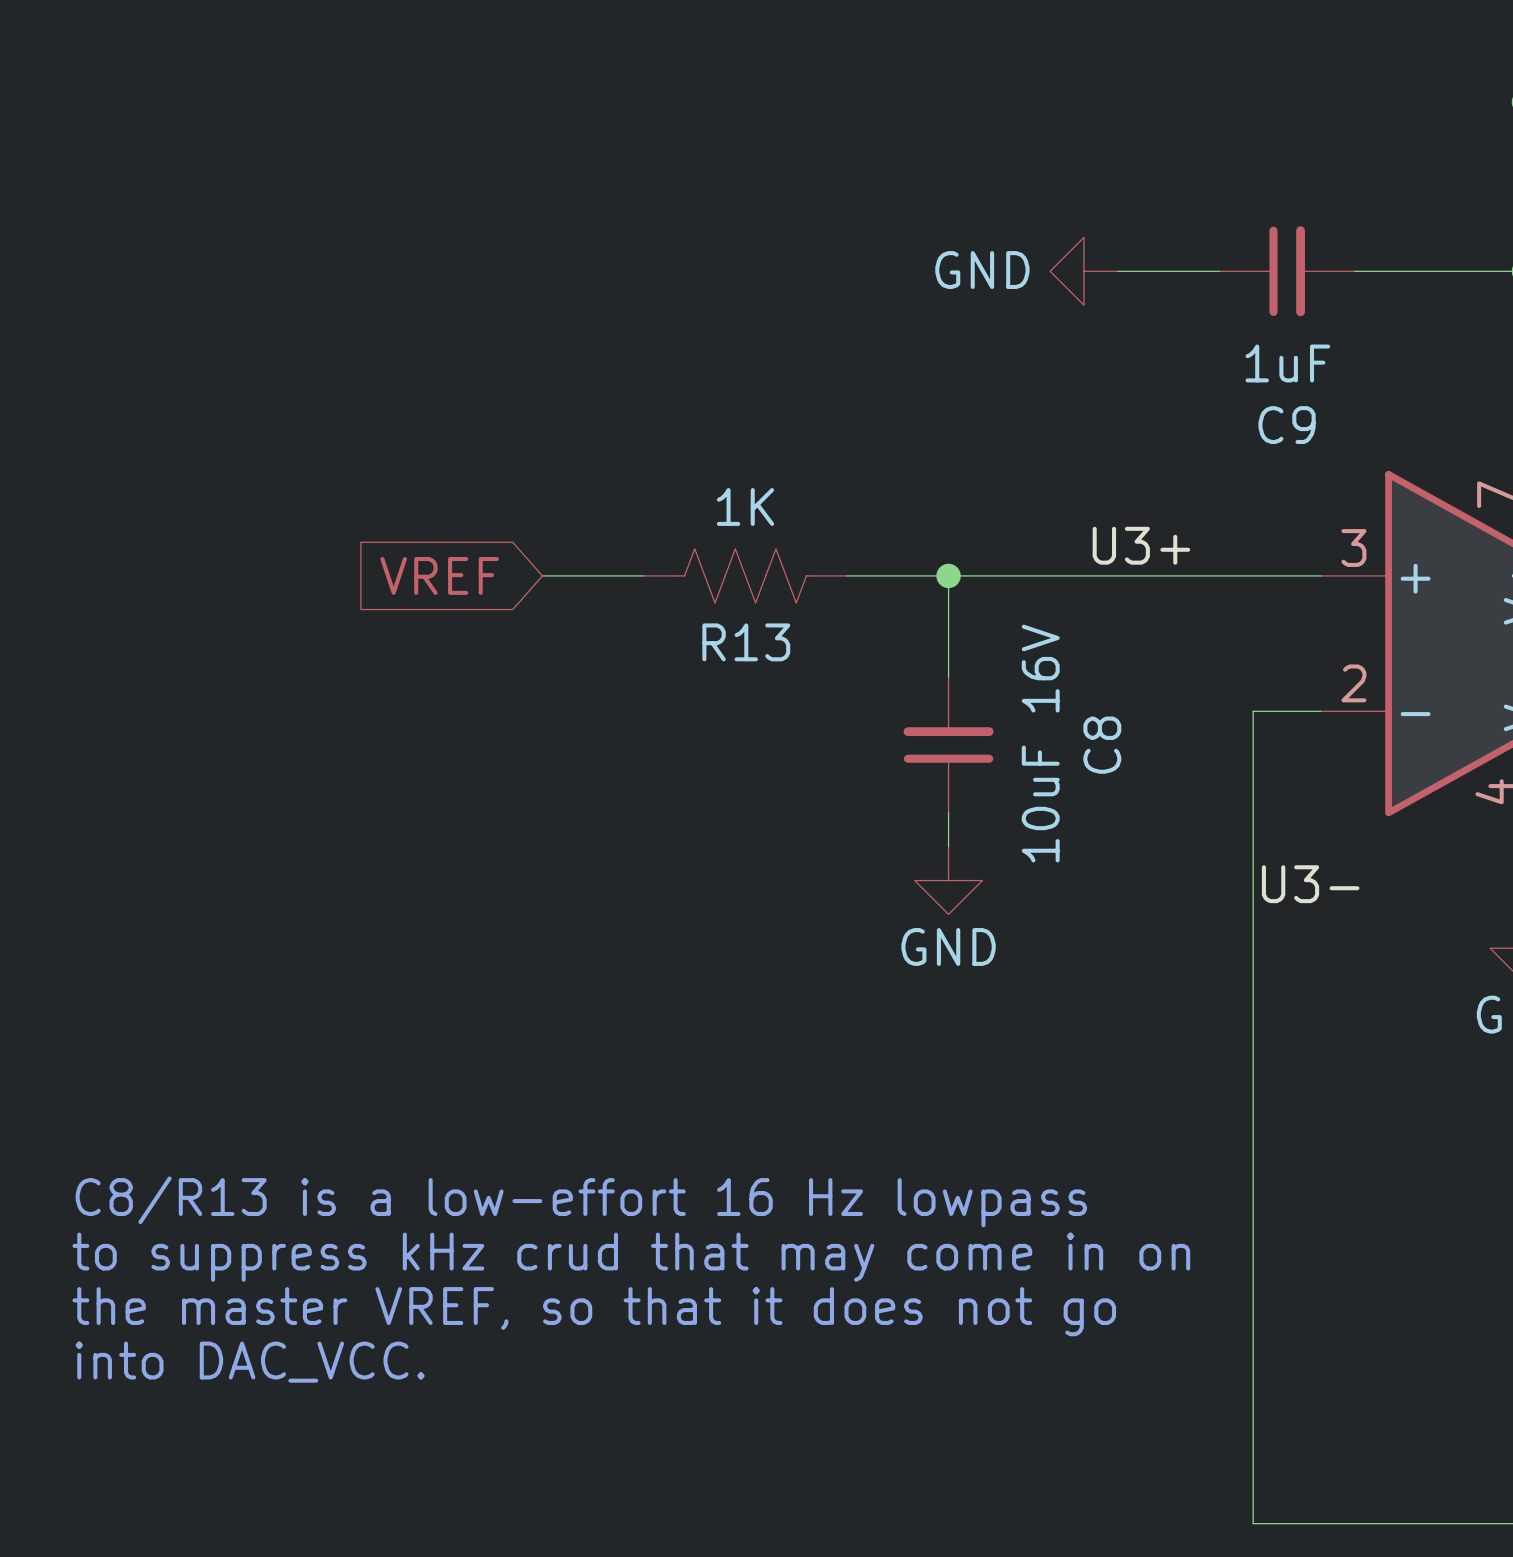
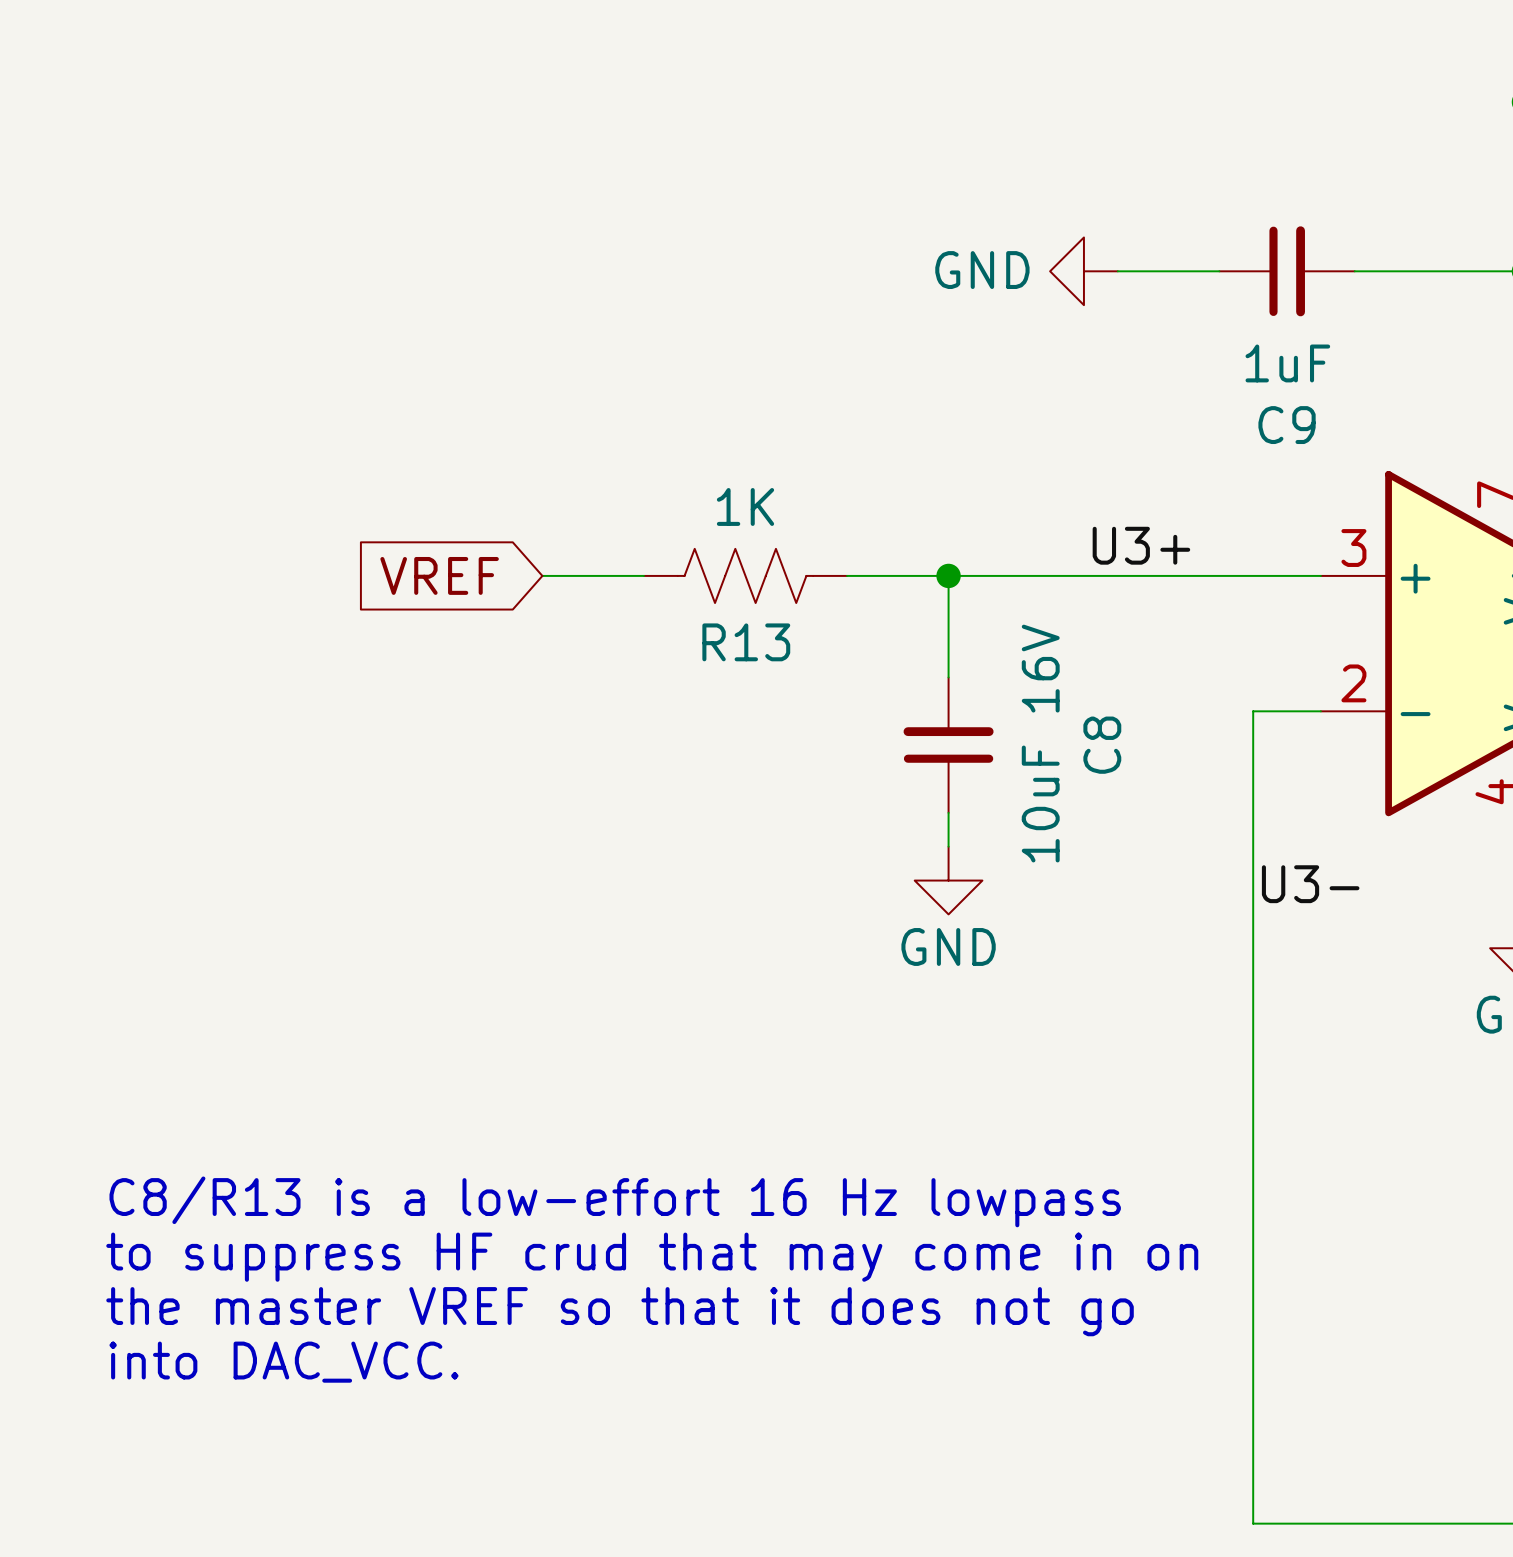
text position: C8/R13 is a low-effort 16 Hz lowpass (581, 1201) -> C8/R13 is a low-effort 16 Hz lowpass (615, 1201)
text: to suppress kHz crud that may come in on (631, 1257) -> to suppress HF crud that may come in on (652, 1257)
text: the master VREF, so that it does not go (594, 1311) -> the master VREF so that it does not go (620, 1311)
text position: into DAC_VCC. (250, 1362) -> into DAC_VCC. (283, 1362)

